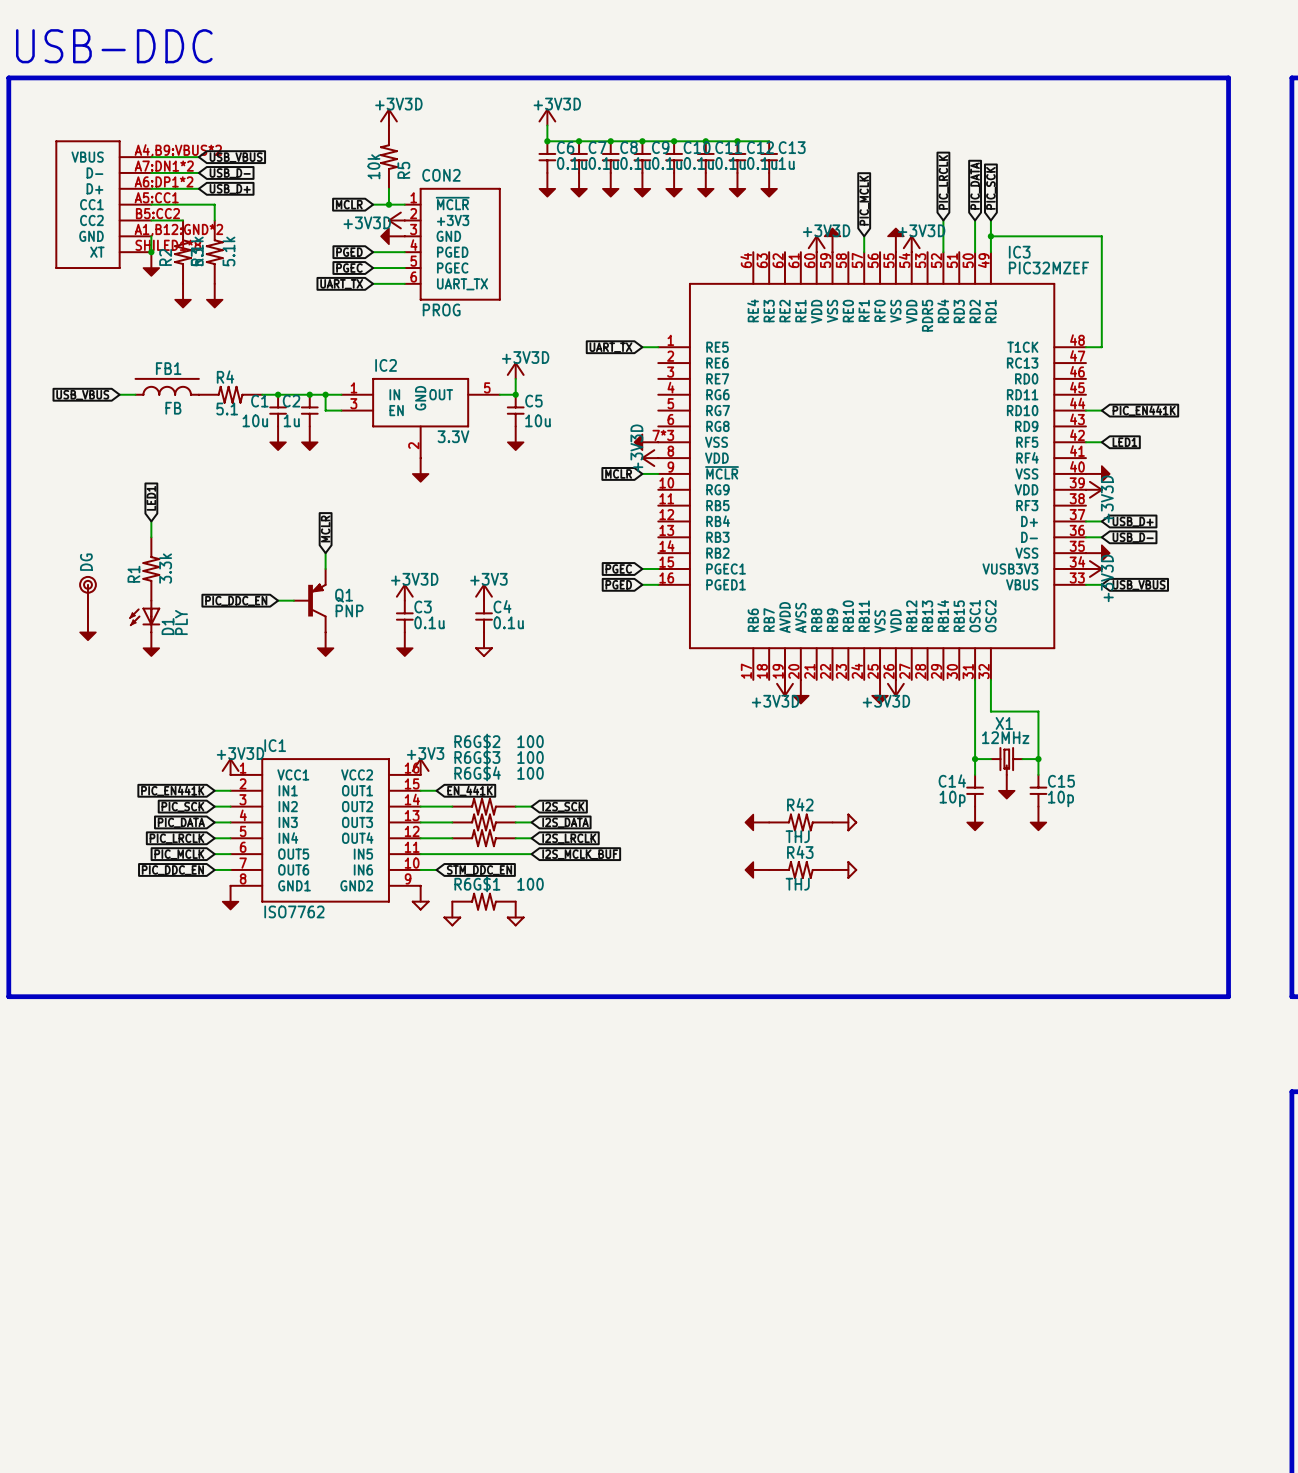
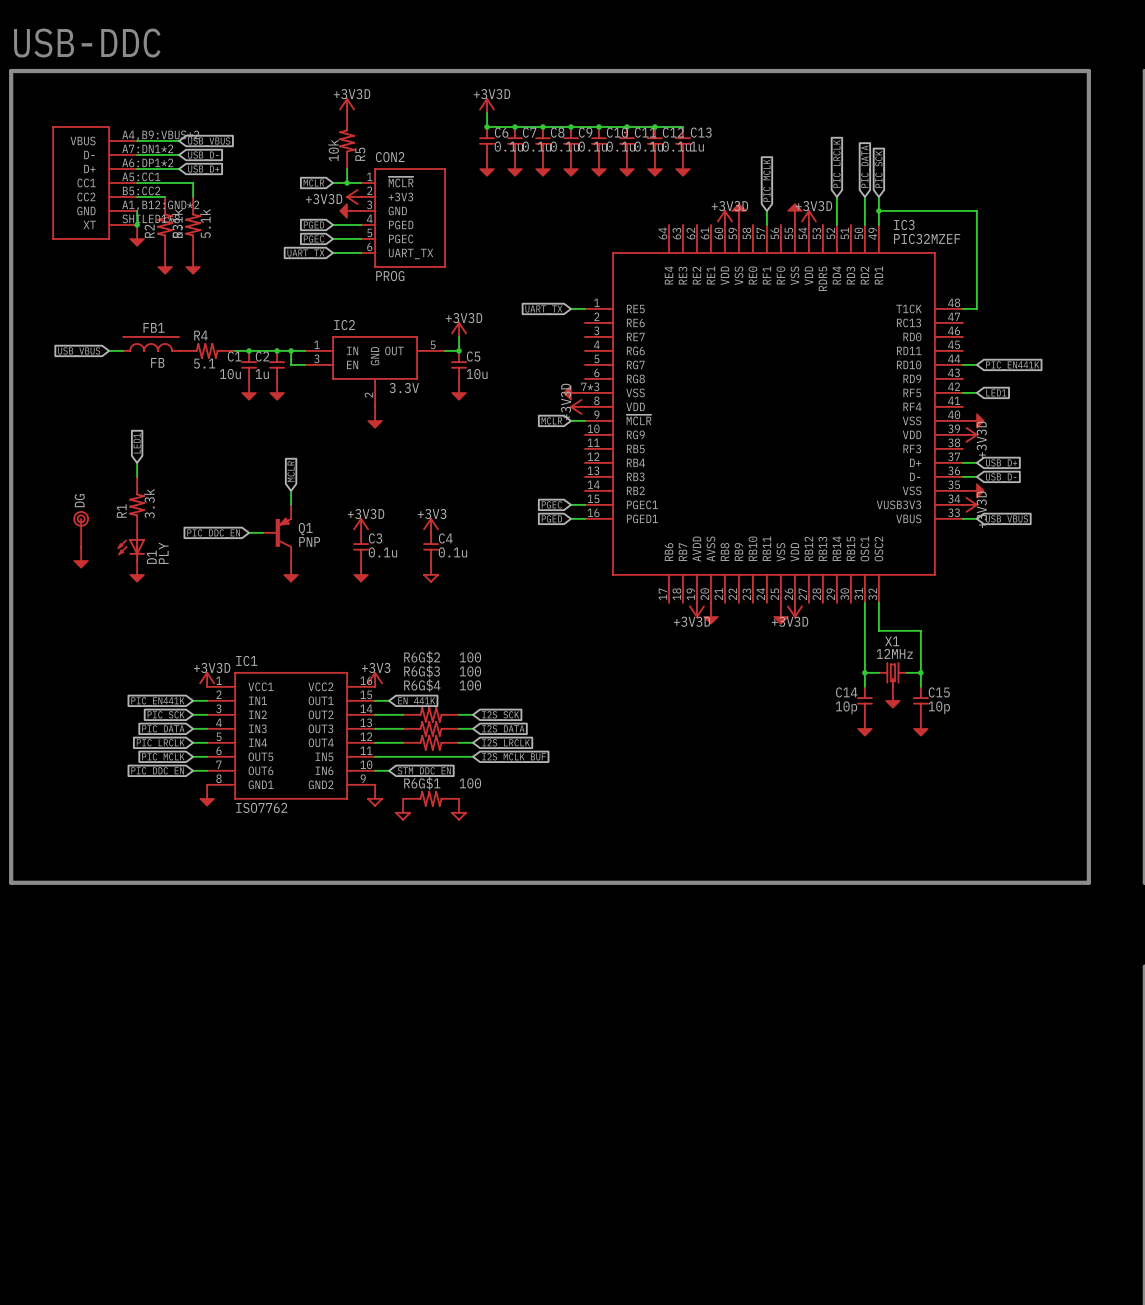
power symbol: (756, 822) -> none
R42: THJ (800, 822) -> none
power symbol: (844, 822) -> none
power symbol: (756, 869) -> none
R43: THJ (800, 869) -> none
power symbol: (844, 869) -> none

